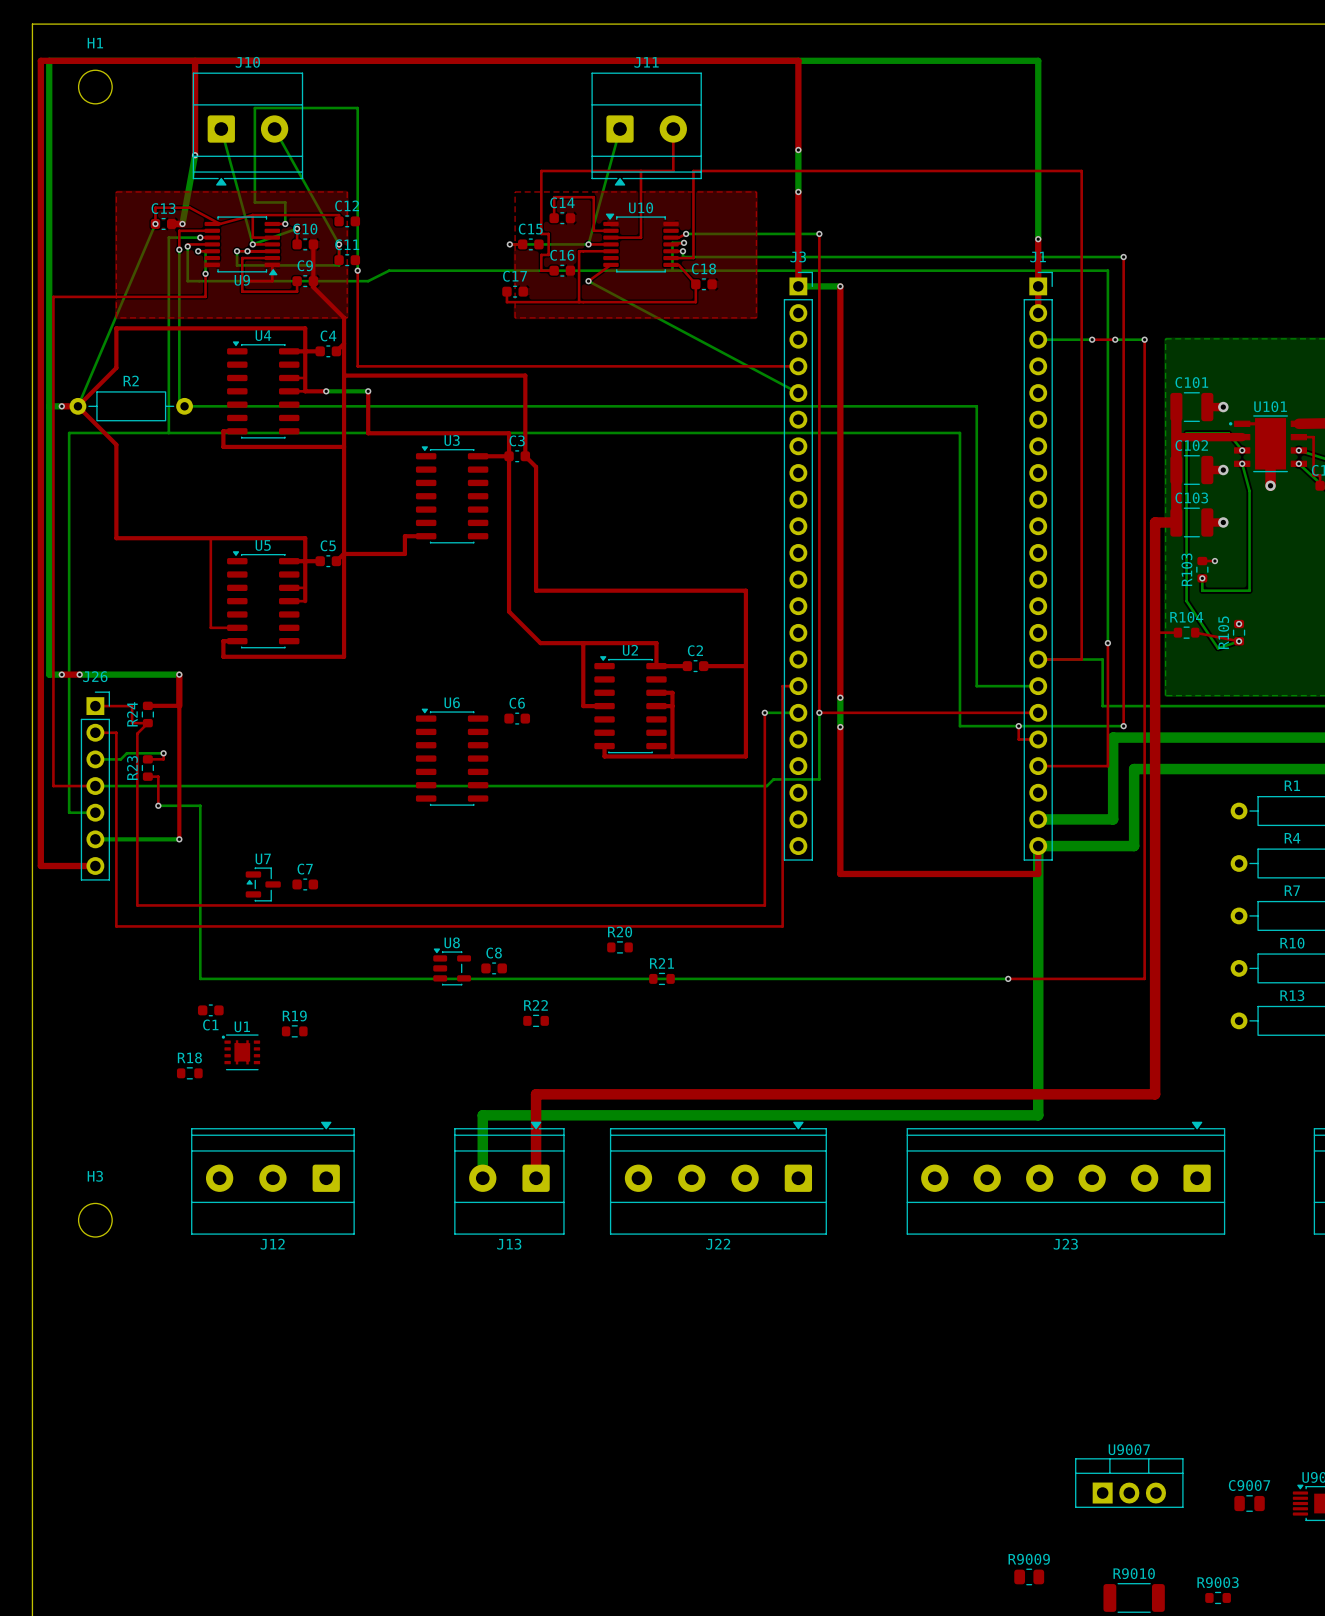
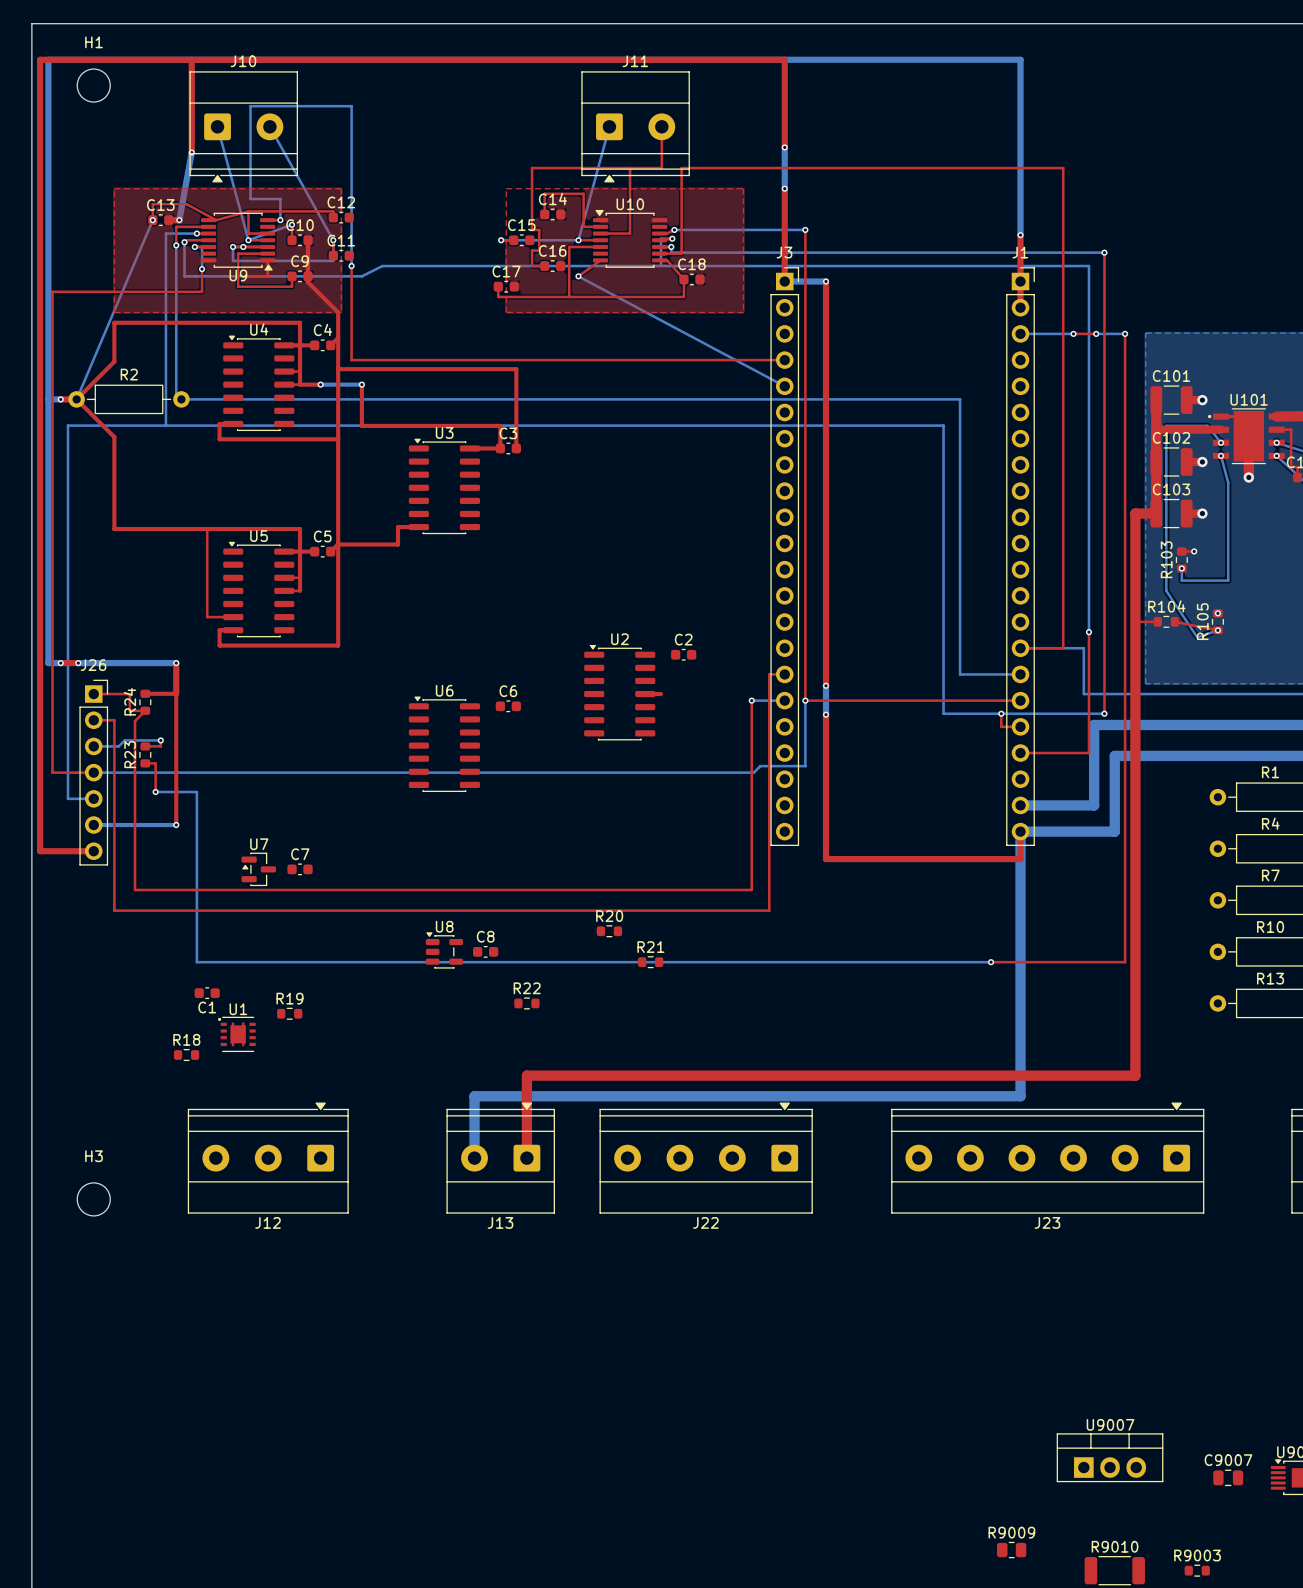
top track: (509, 456) (509, 611) (540, 643) (656, 643) (656, 666) (687, 666) -> none
top track: (525, 456) (536, 467) (536, 590) (745, 590) (745, 756) (604, 756) (604, 746) -> none
top track: (583, 643) (583, 706) (604, 706) -> none
top track: (703, 666) (745, 666) -> none
top track: (656, 692) (672, 692) (672, 756) -> none

